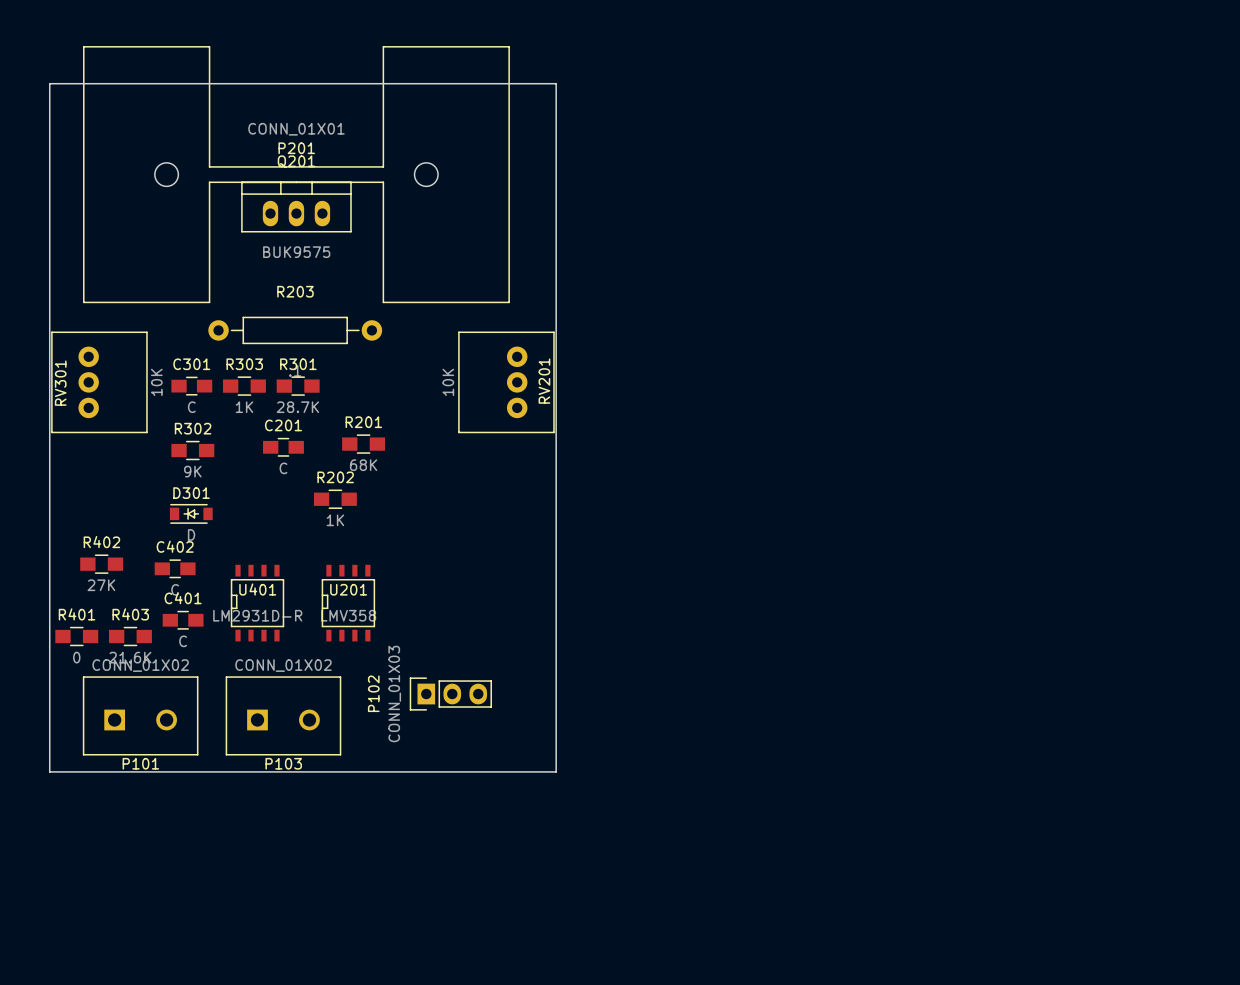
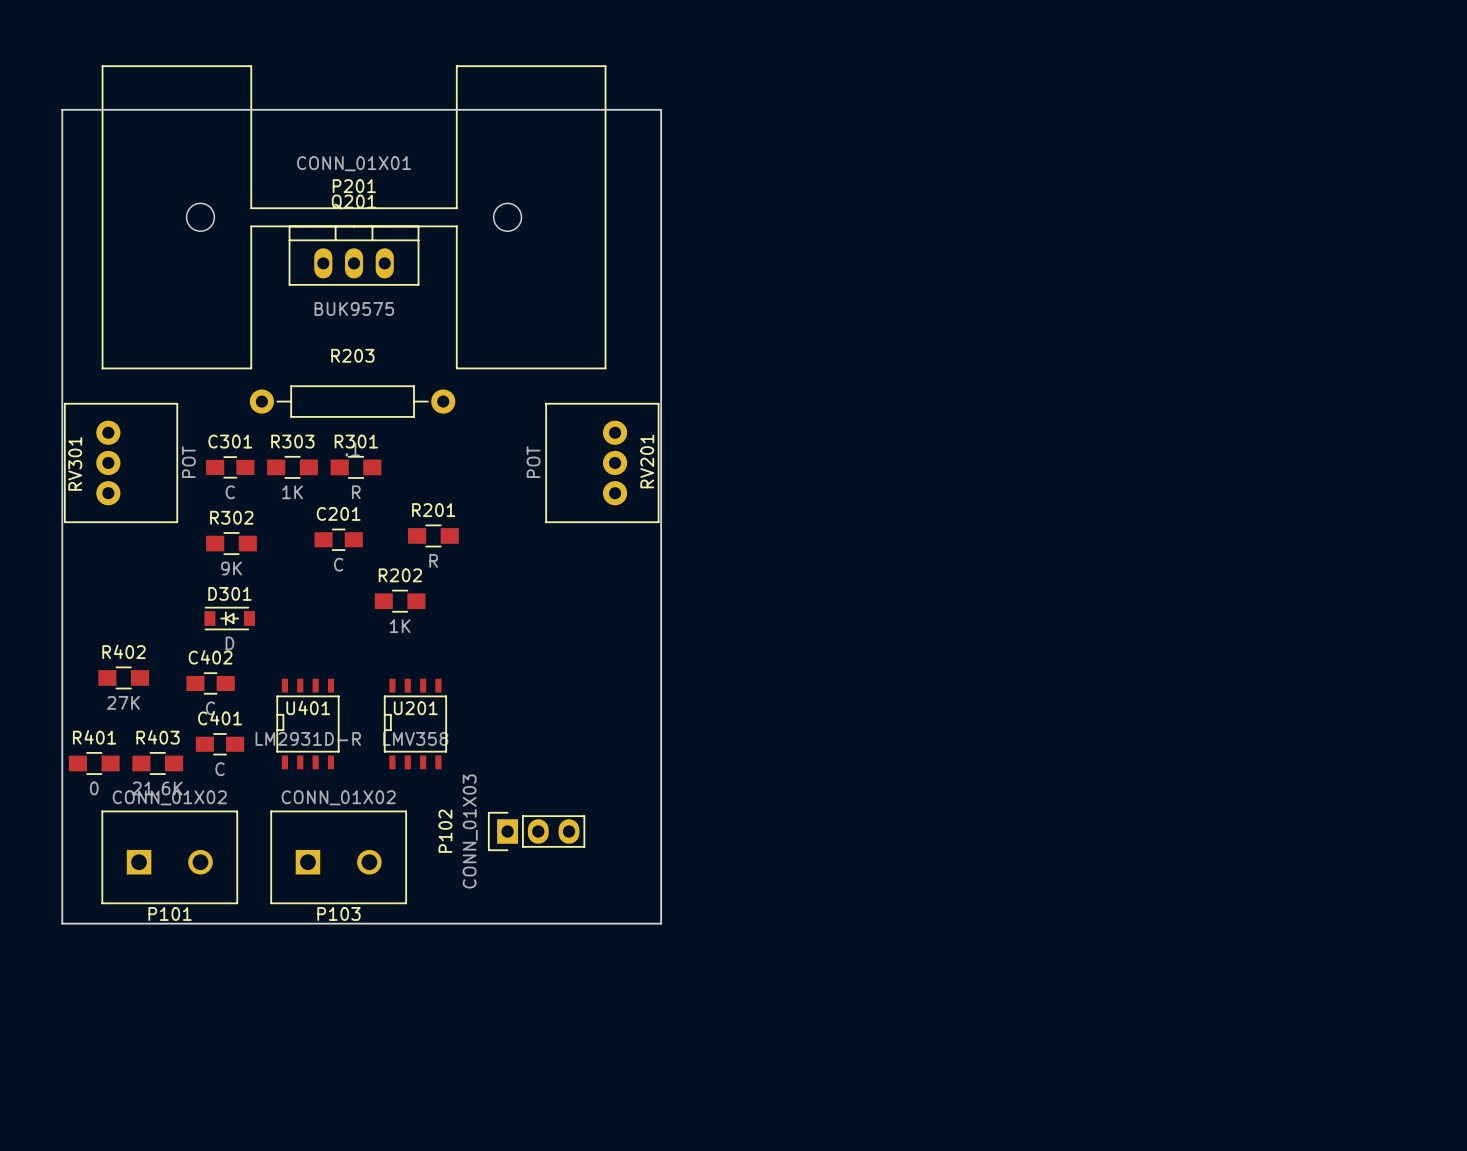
RV301 value: 10K (156, 382) -> POT (188, 462)
RV201 value: 10K (448, 382) -> POT (533, 462)
R301 value: 28.7K (297, 407) -> R (356, 492)
R201 value: 68K (363, 465) -> R (433, 560)

